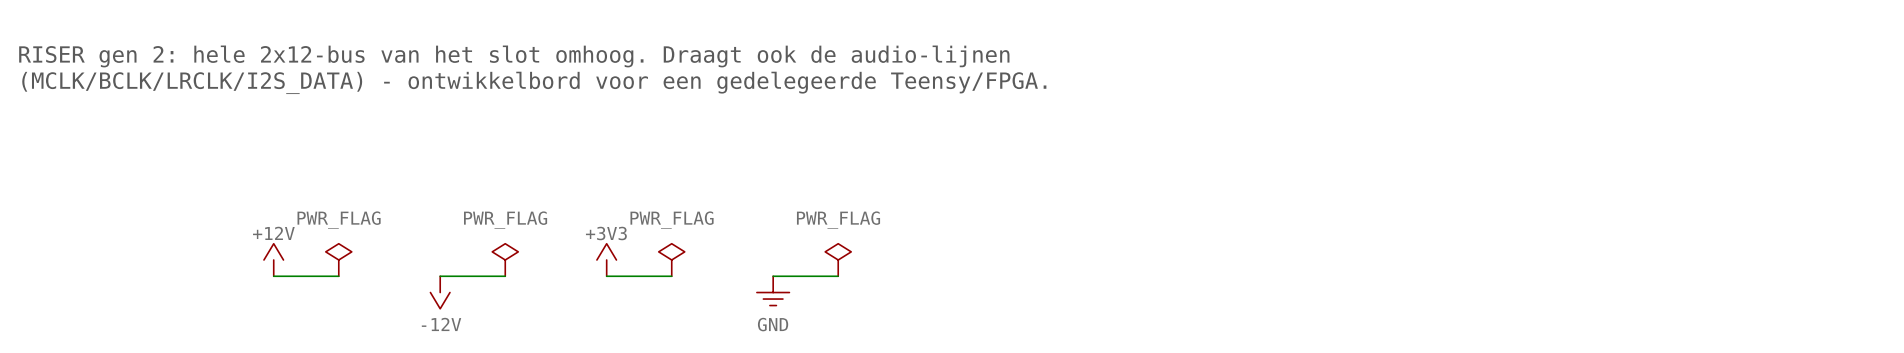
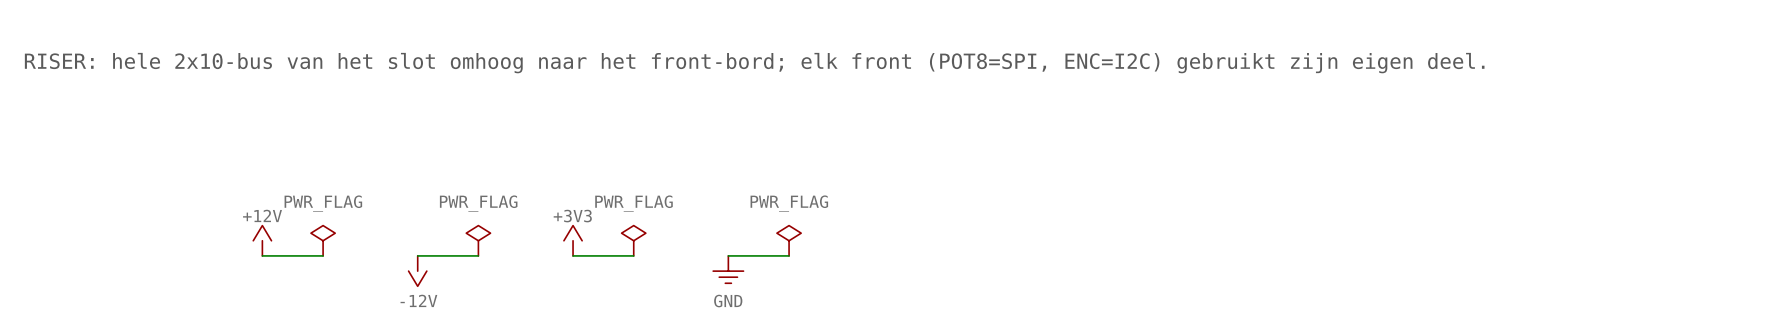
text: RISER gen 2: hele 2x12-bus van het slot omhoog. Draagt ook de audio-lijnen (514, 56) -> none
text: none -> RISER: hele 2x10-bus van het slot omhoog naar het front-bord; elk front (POT8=SPI, ENC=I2C) gebruikt zijn eigen deel. (754, 63)
text: (MCLK/BCLK/LRCLK/I2S_DATA) - ontwikkelbord voor een gedelegeerde Teensy/FPGA. (534, 82) -> none

